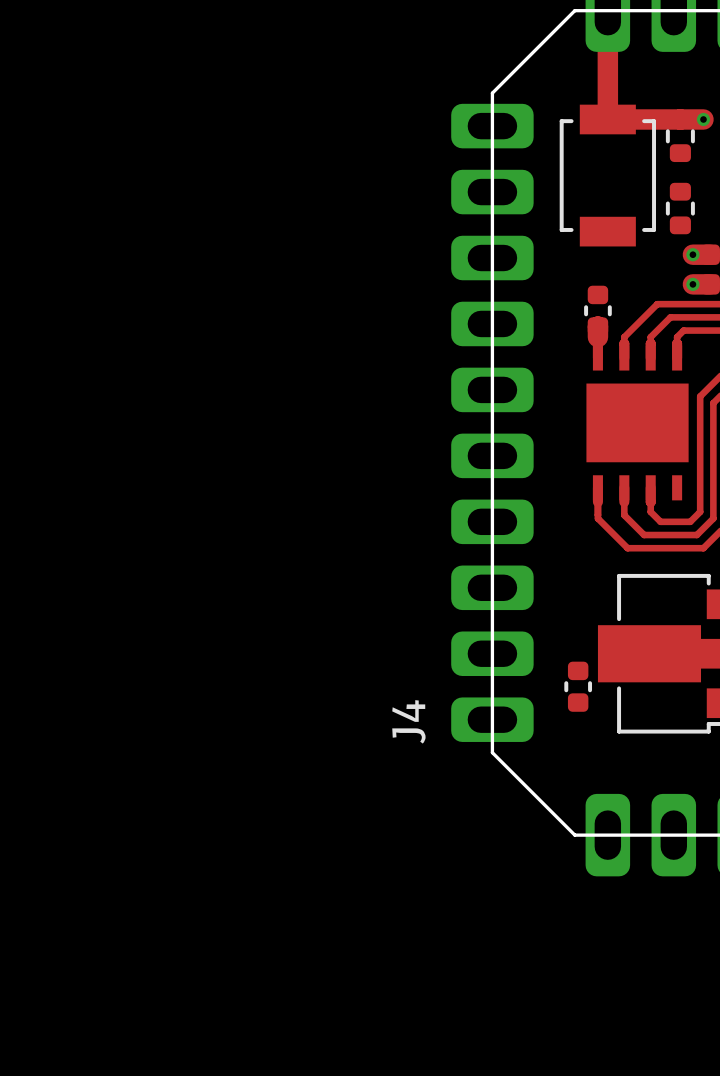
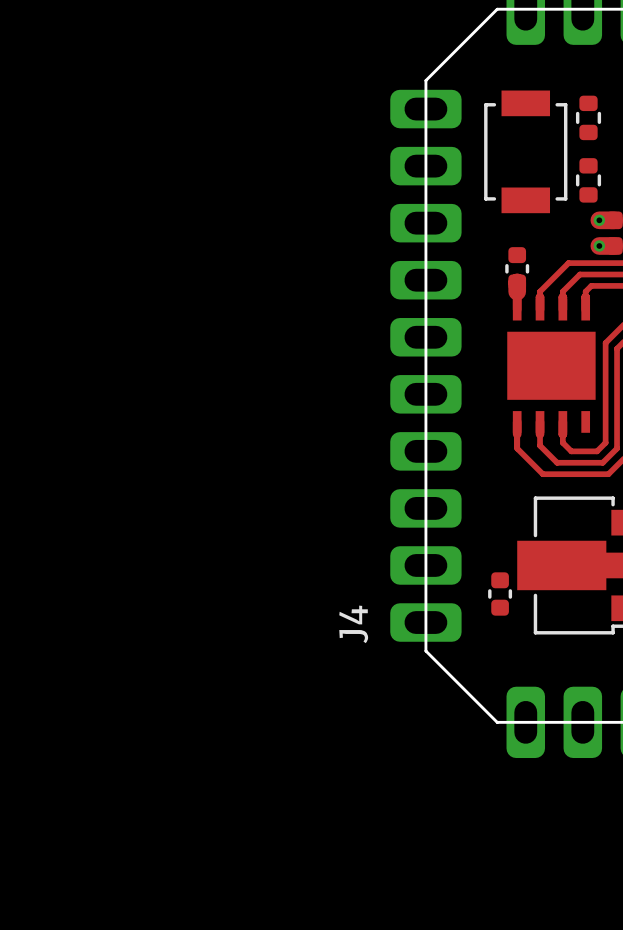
track: (607, 20) (607, 119) (703, 119) -> none
via: (703, 119) -> none

